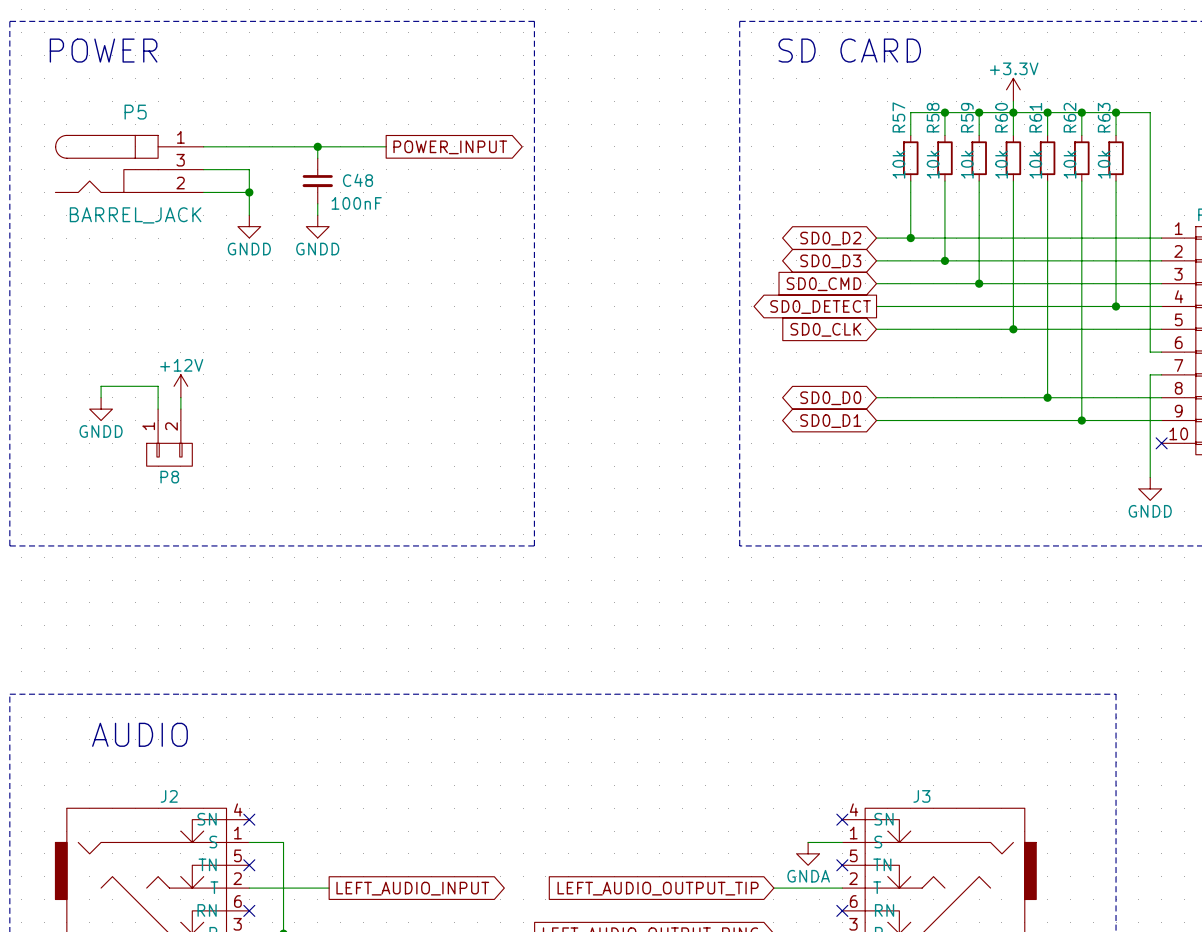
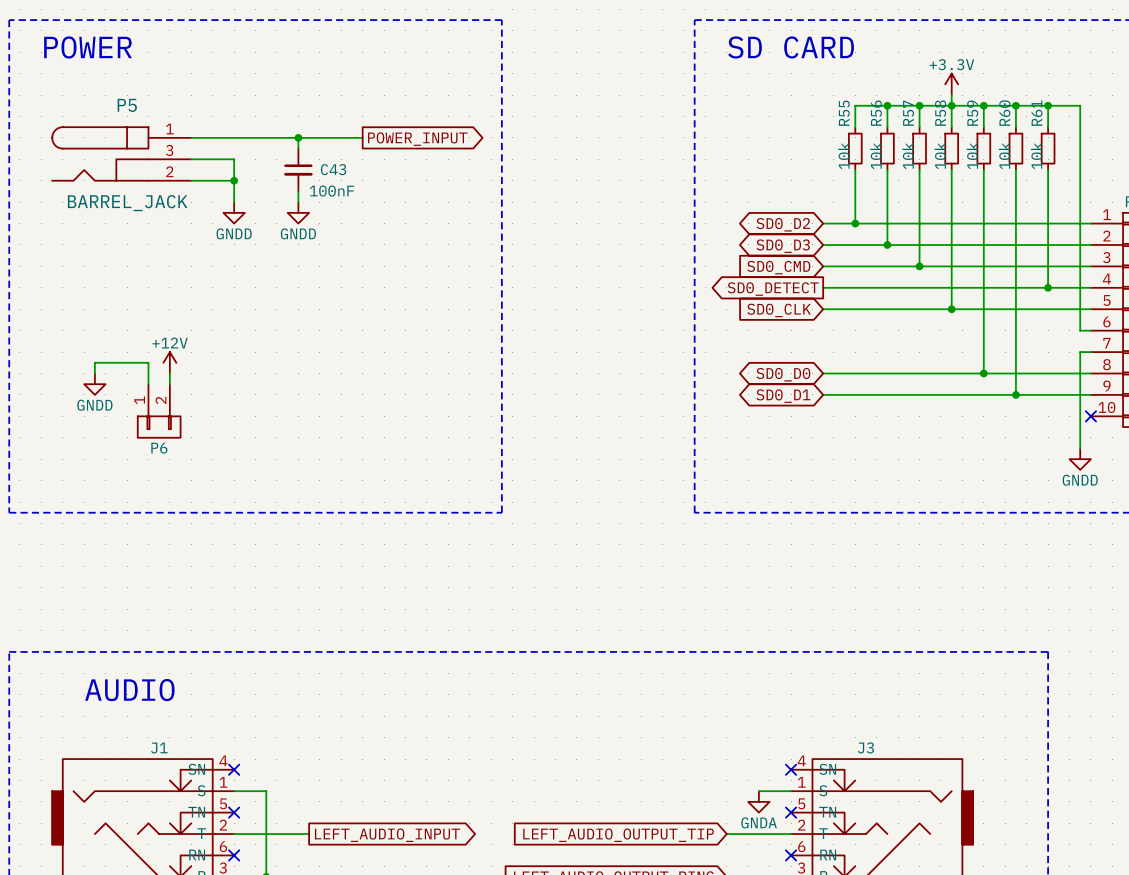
R57 name: R57 (898, 117) -> R55 (844, 113)
R58 name: R58 (933, 117) -> R56 (876, 113)
R59 name: R59 (967, 117) -> R57 (908, 113)
R60 name: R60 (1001, 117) -> R58 (940, 113)
R61 name: R61 (1035, 117) -> R59 (972, 113)
R62 name: R62 (1069, 117) -> R60 (1004, 113)
R63 name: R63 (1104, 117) -> R61 (1037, 113)
C48 name: C48 (358, 180) -> C43 (333, 169)
P8 name: P8 (169, 477) -> P6 (159, 448)
J2 name: J2 (169, 796) -> J1 (159, 748)

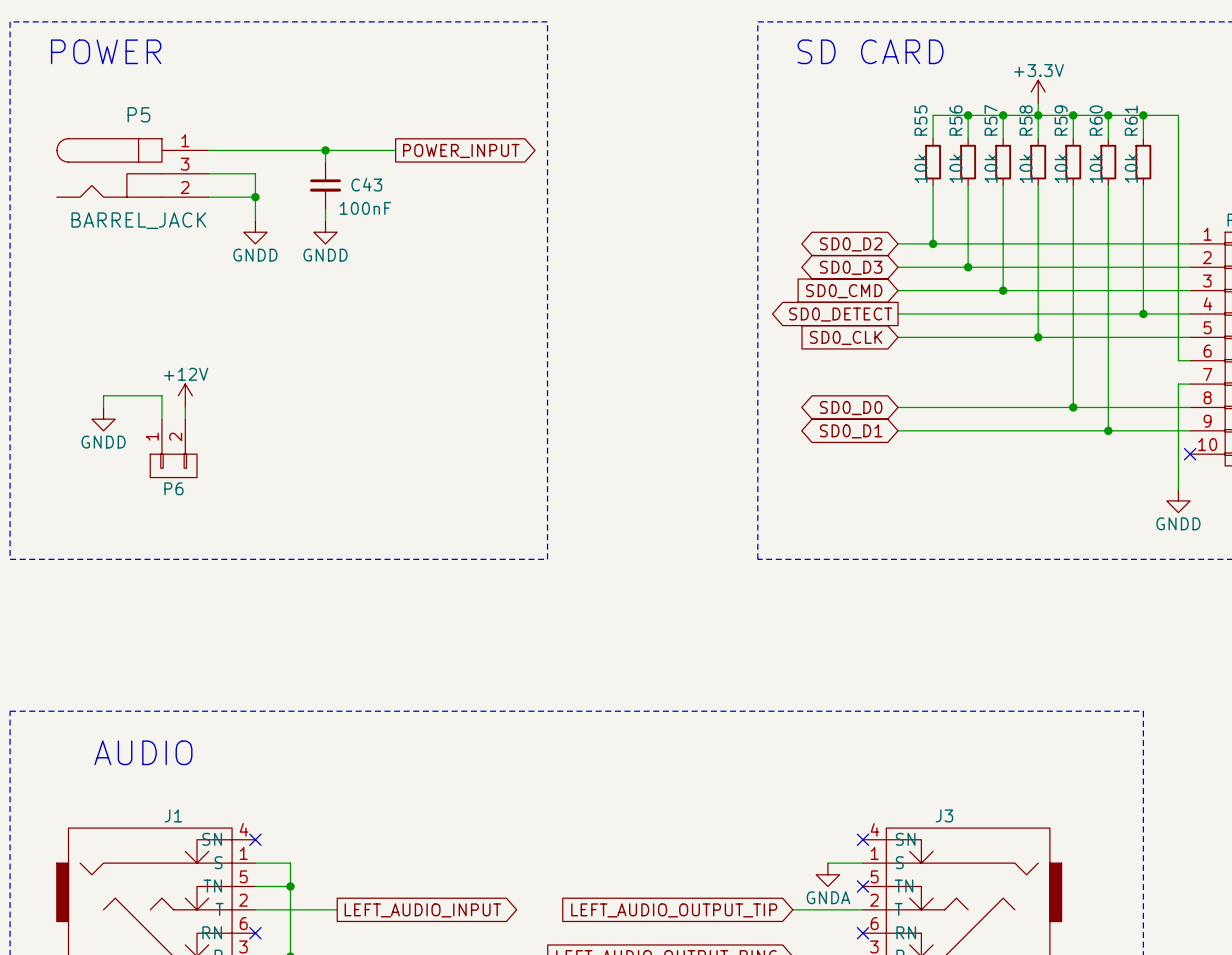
wire: none -> (255, 886) (290, 886)
no-connect mark: (234, 812) -> none
junction: none -> (290, 886)

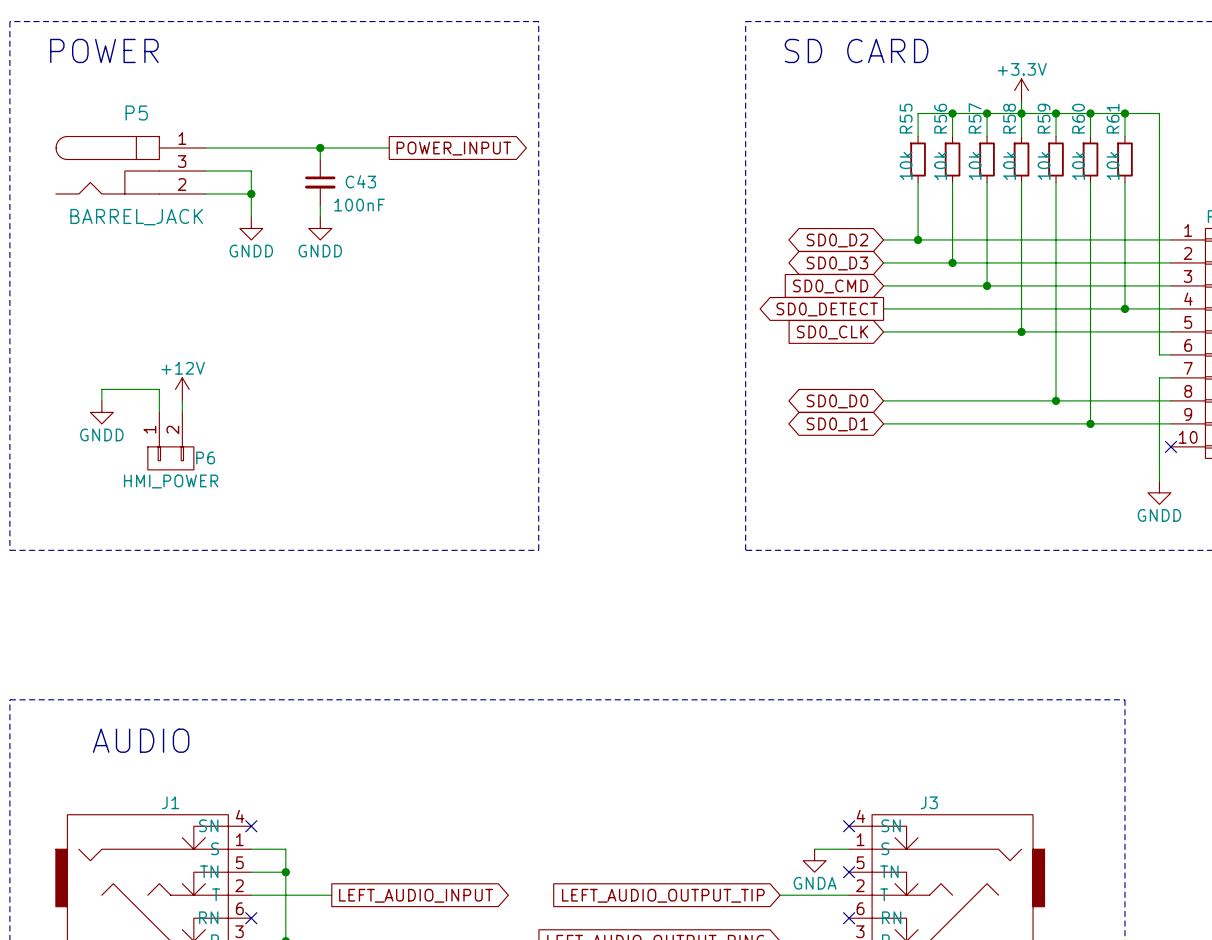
P6 name position: P6 (173, 488) -> P6 (205, 457)
P6 value: none -> HMI_POWER (171, 481)

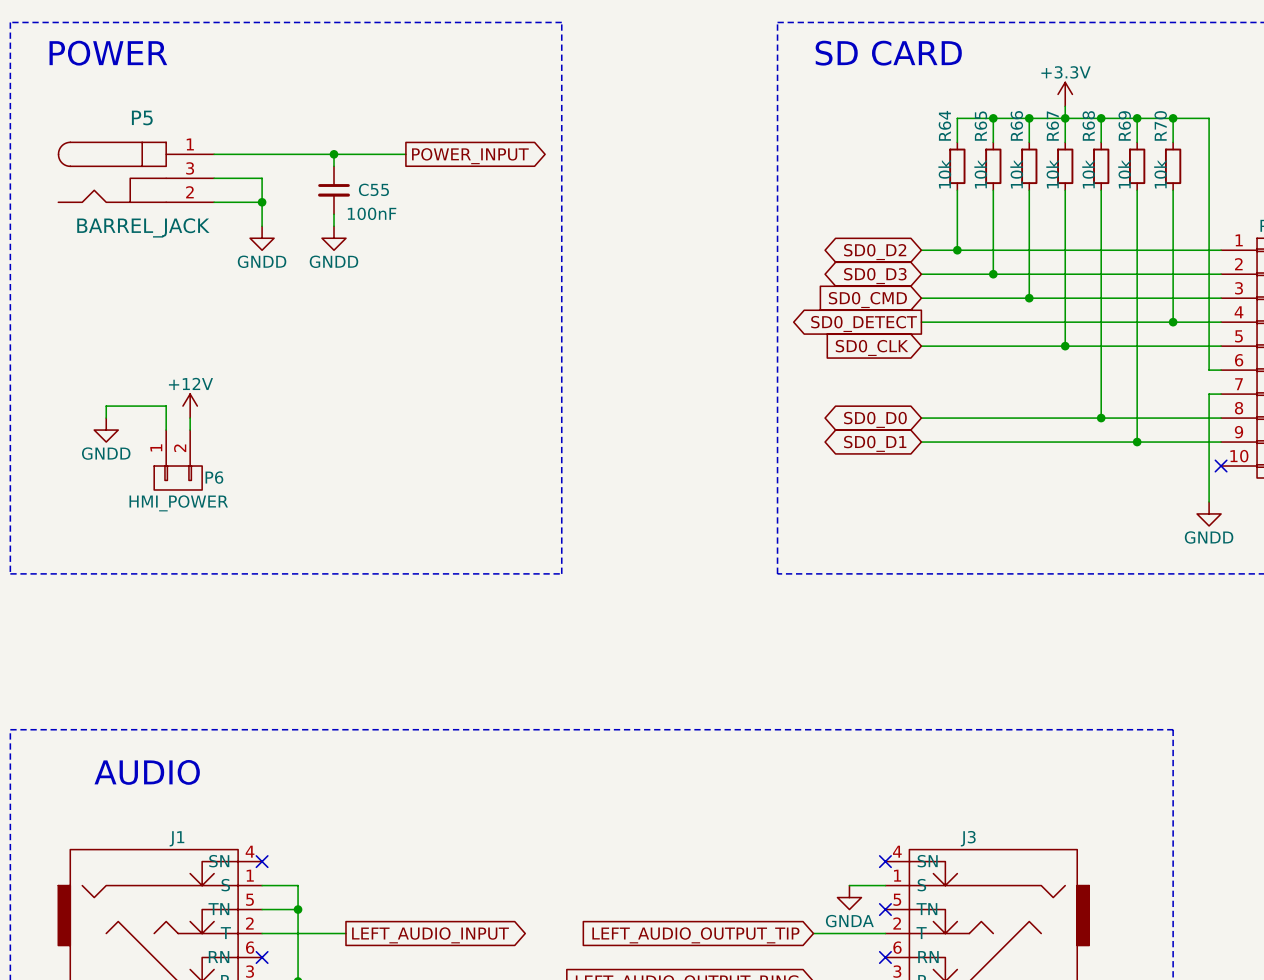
R55 name: R55 (906, 118) -> R64 (944, 125)
R56 name: R56 (940, 118) -> R65 (980, 126)
R57 name: R57 (975, 118) -> R66 (1016, 125)
R58 name: R58 (1009, 118) -> R67 (1052, 126)
R59 name: R59 (1044, 118) -> R68 (1088, 125)
R60 name: R60 (1078, 118) -> R69 (1124, 125)
R61 name: R61 (1113, 118) -> R70 (1160, 125)
C43 name: C43 (360, 181) -> C55 (373, 189)

